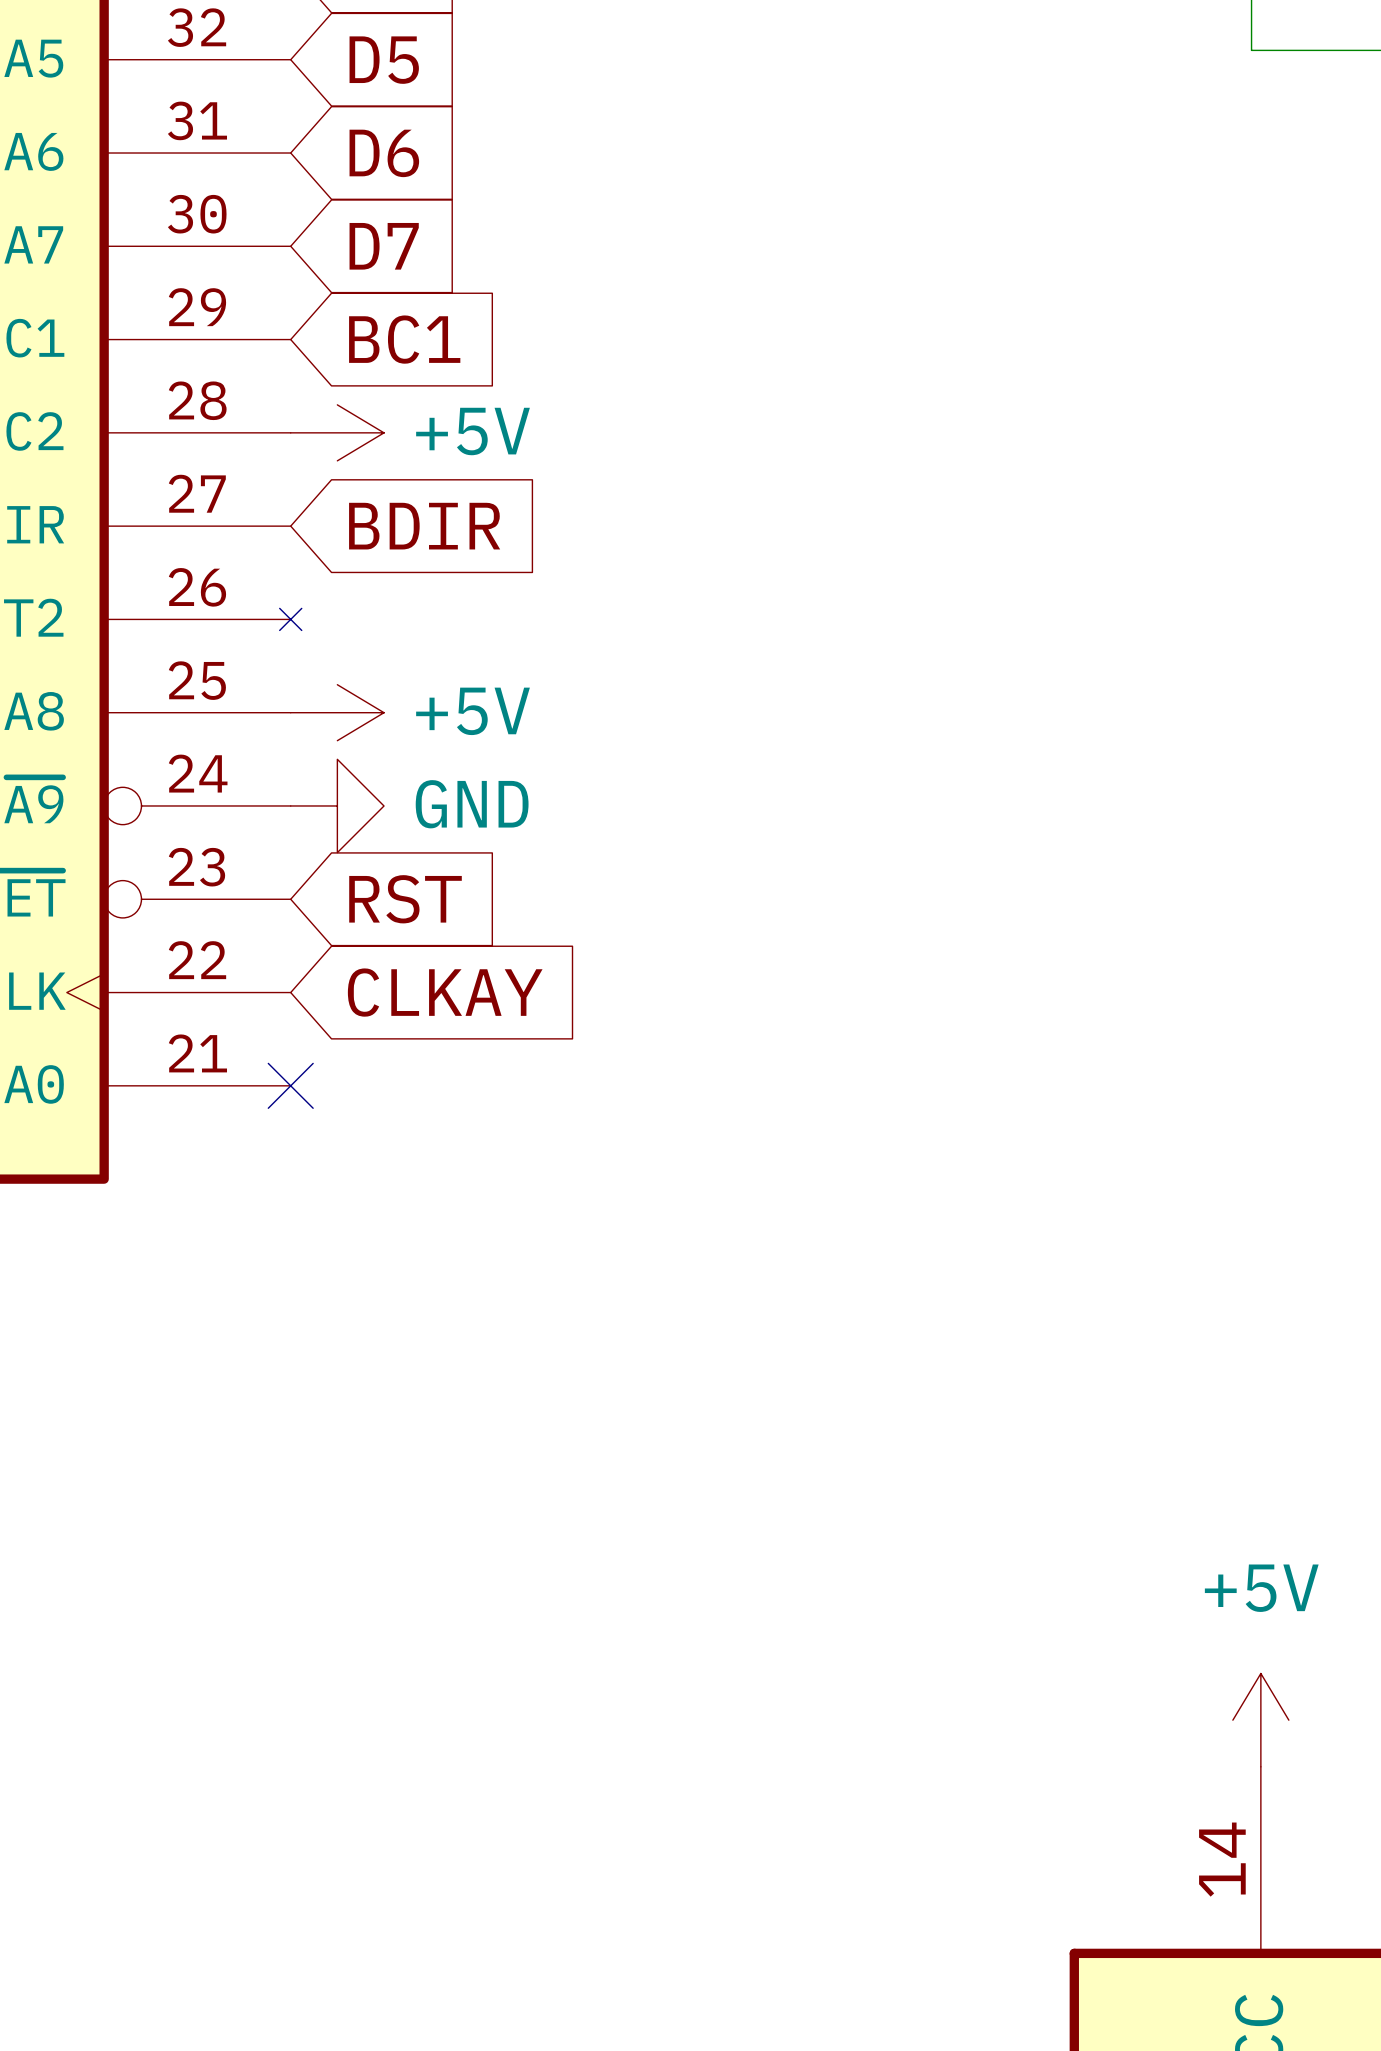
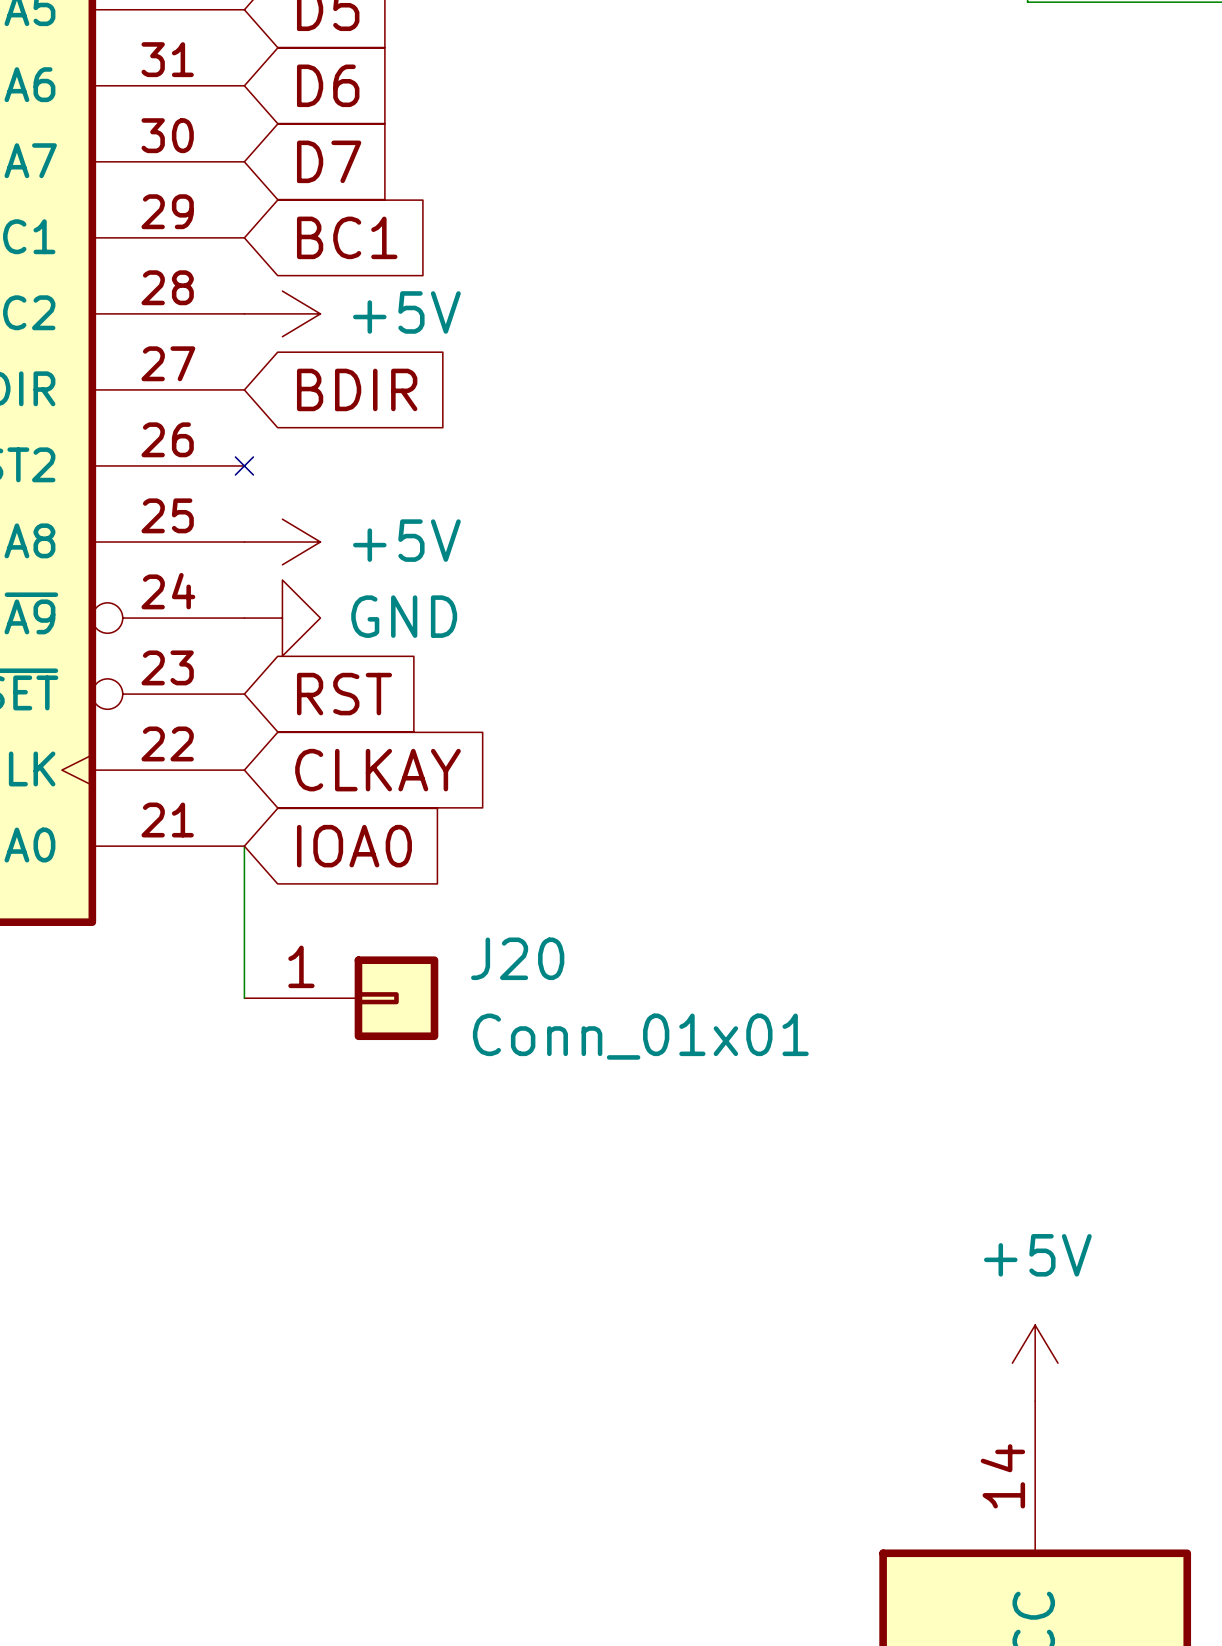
wire: none -> (244, 846) (244, 998)
no-connect mark: (290, 1085) -> none
global label: none -> IOA0 (354, 846)
J20: none -> Conn_01x01 (341, 998)

